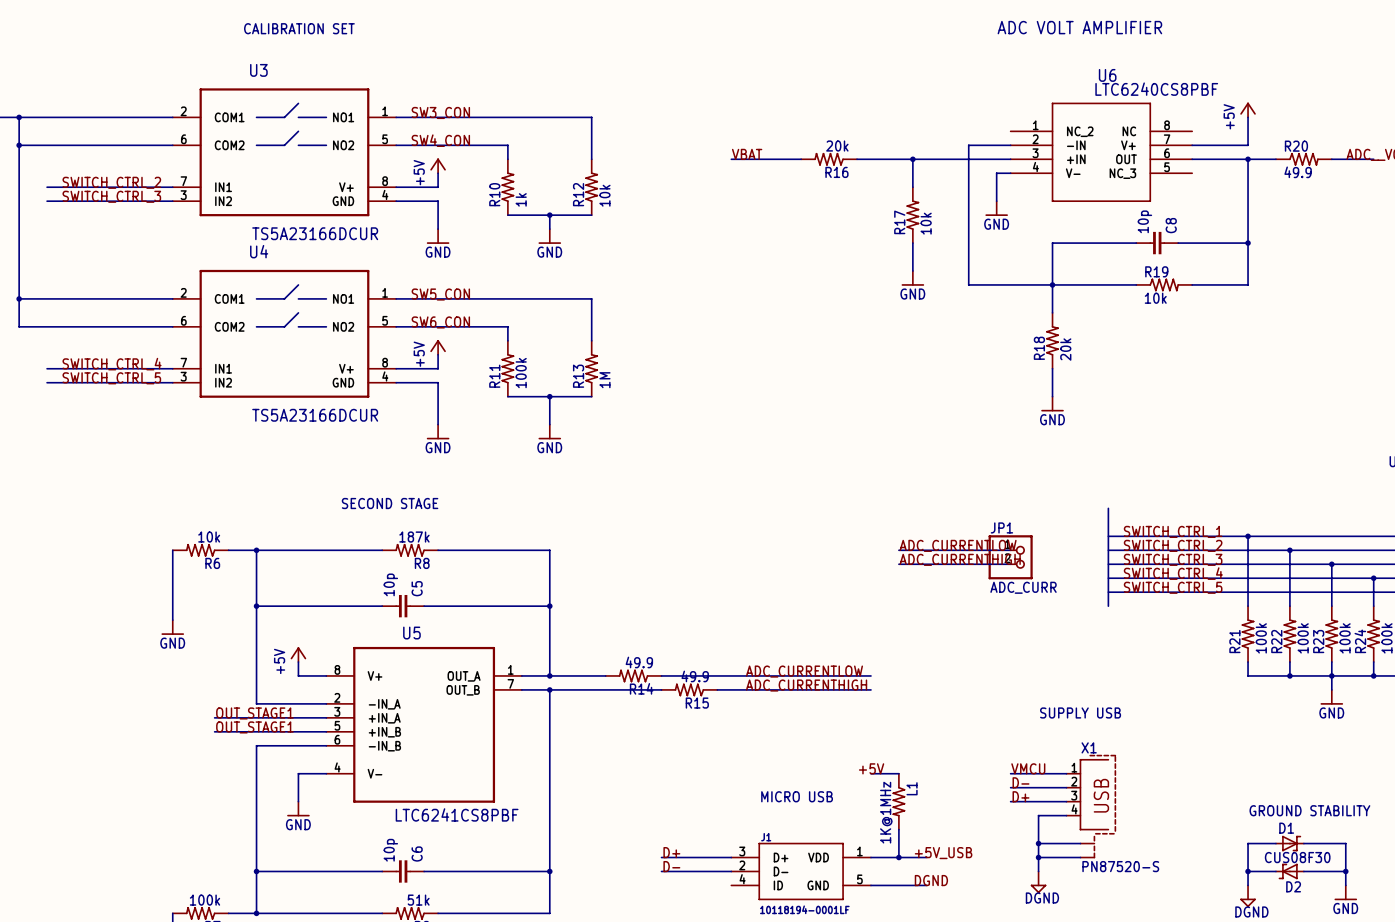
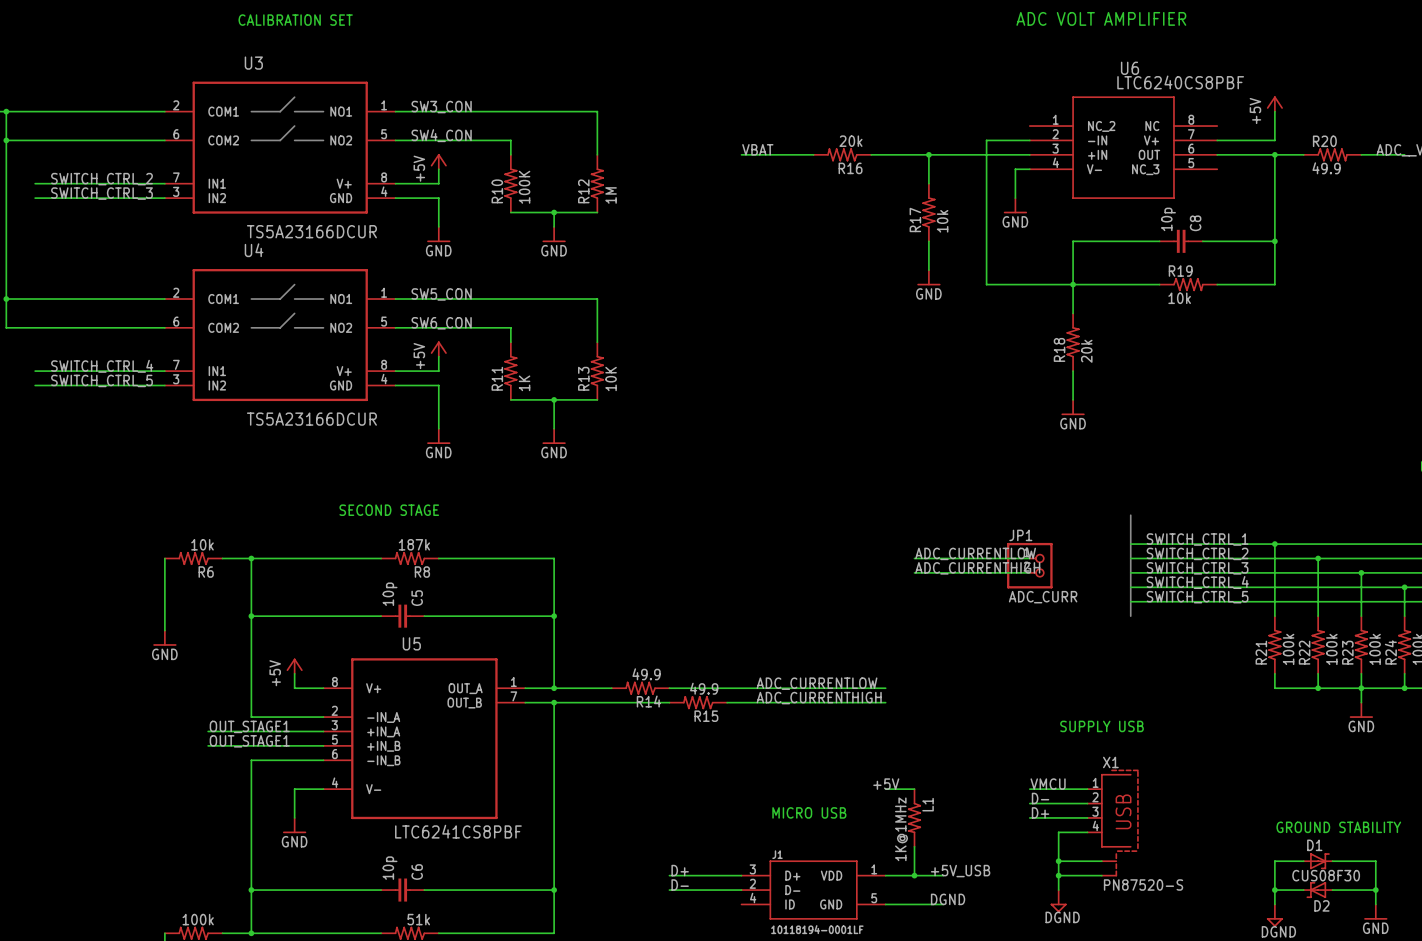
R12 value: 10k (604, 195) -> 1M (611, 195)
R10 value: 1k (521, 199) -> 100K (524, 187)
R11 value: 100k (521, 373) -> 1K (524, 383)
R13 value: 1M (604, 380) -> 10K (611, 378)

